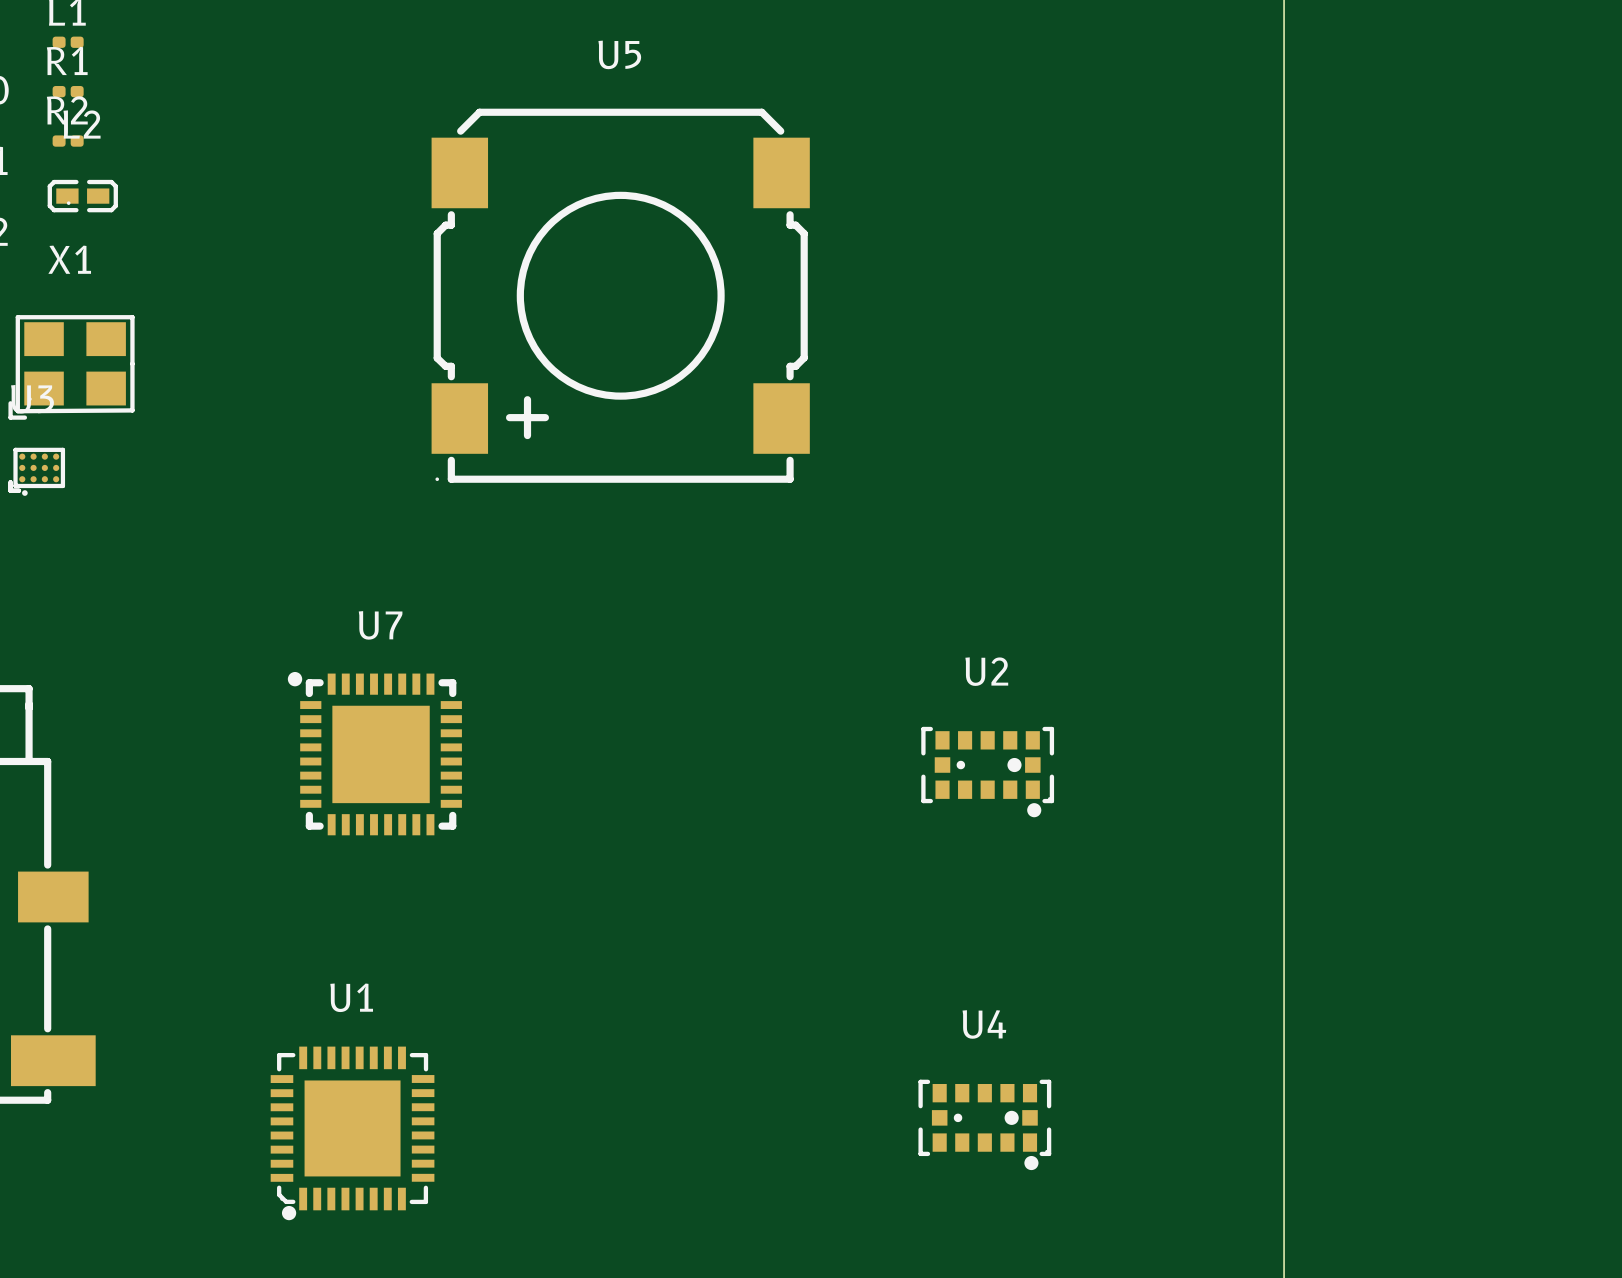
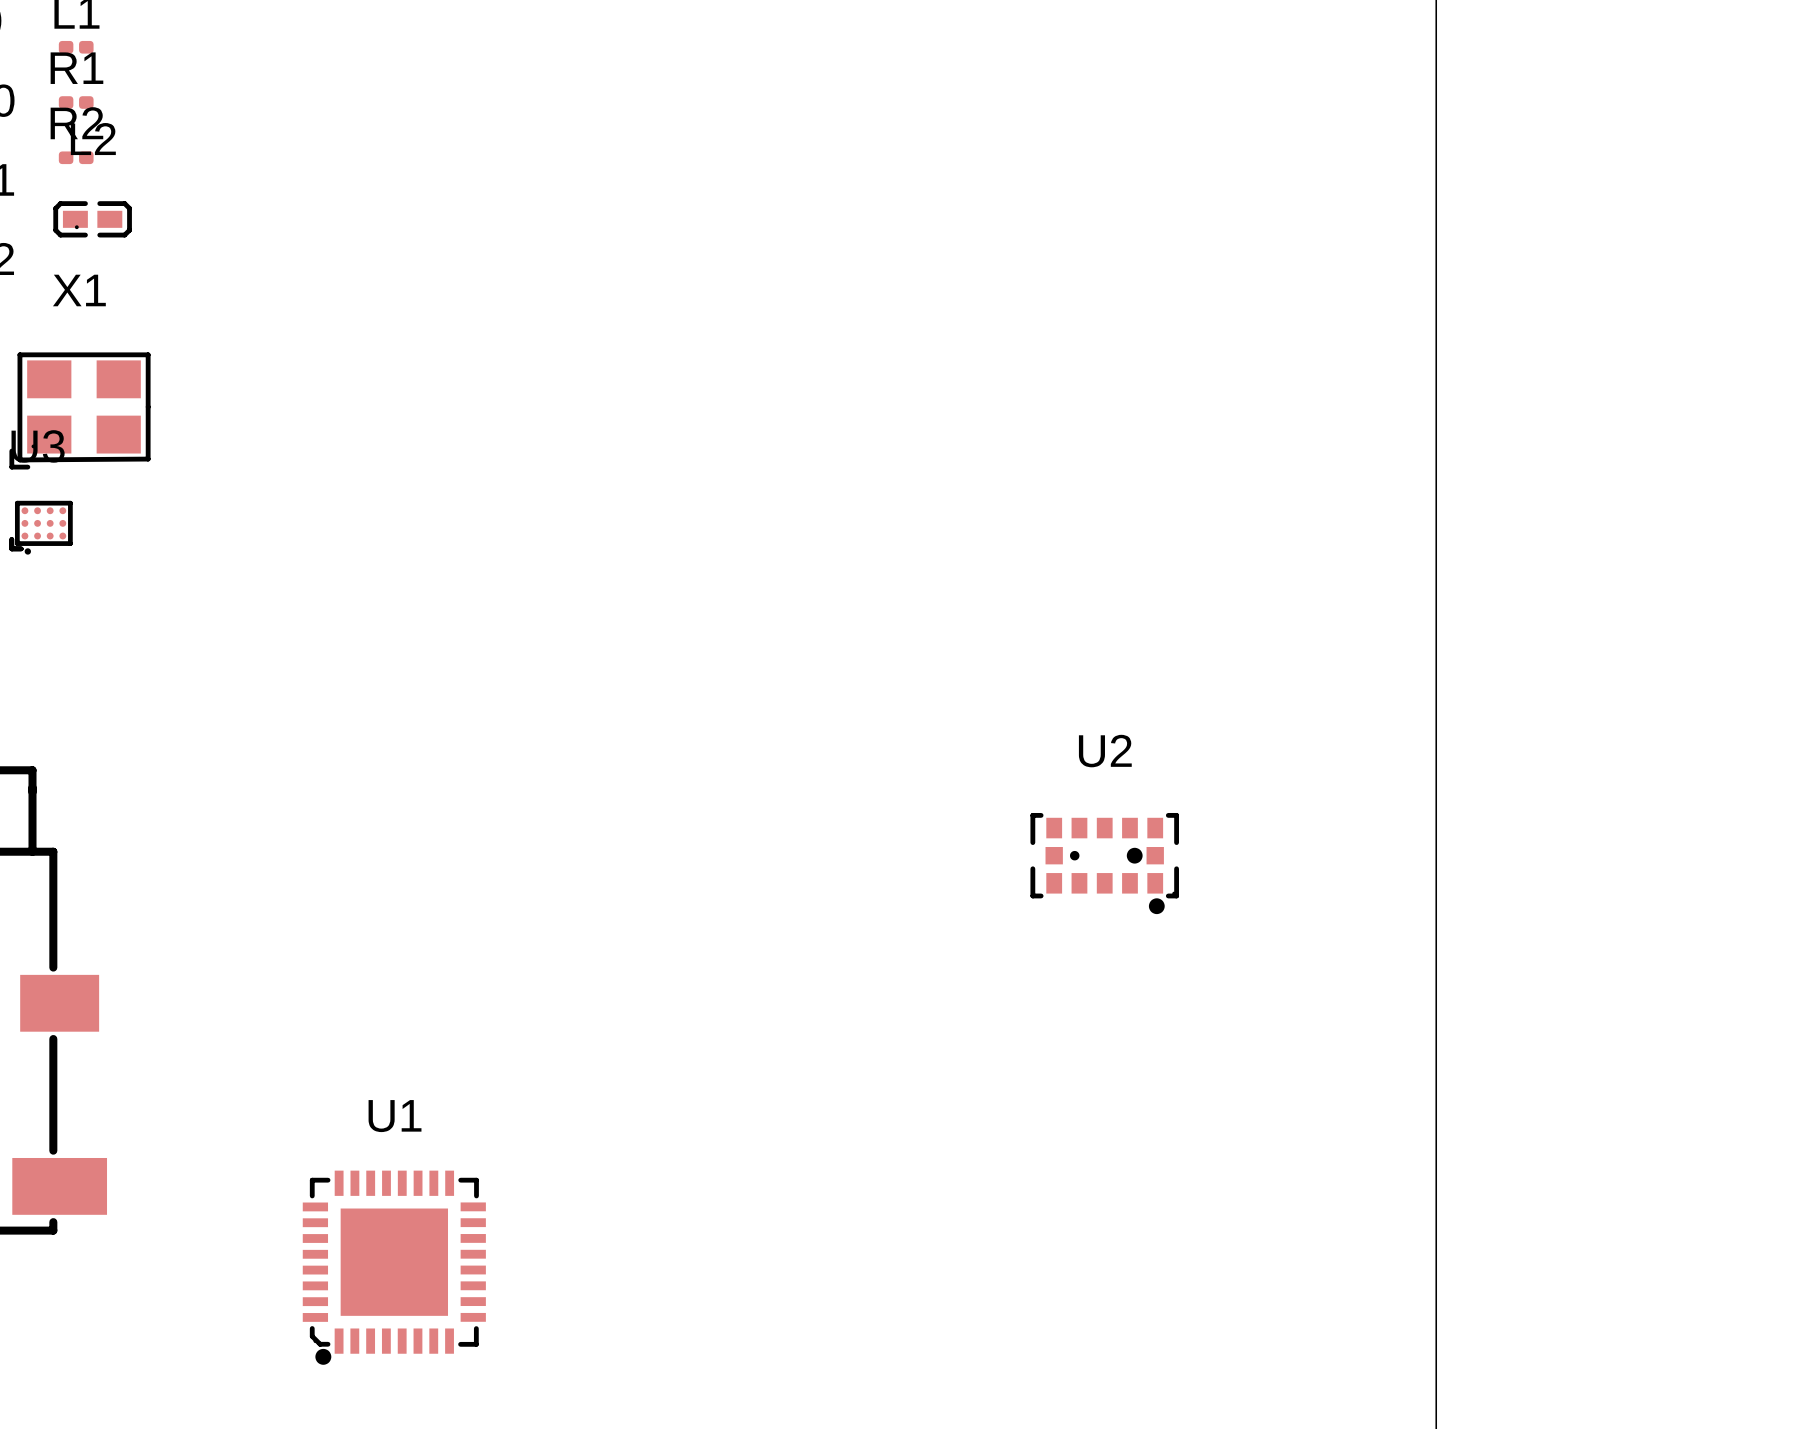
U5: (620, 295) -> none
U7: (374, 753) -> none
U4: (984, 1124) -> none

